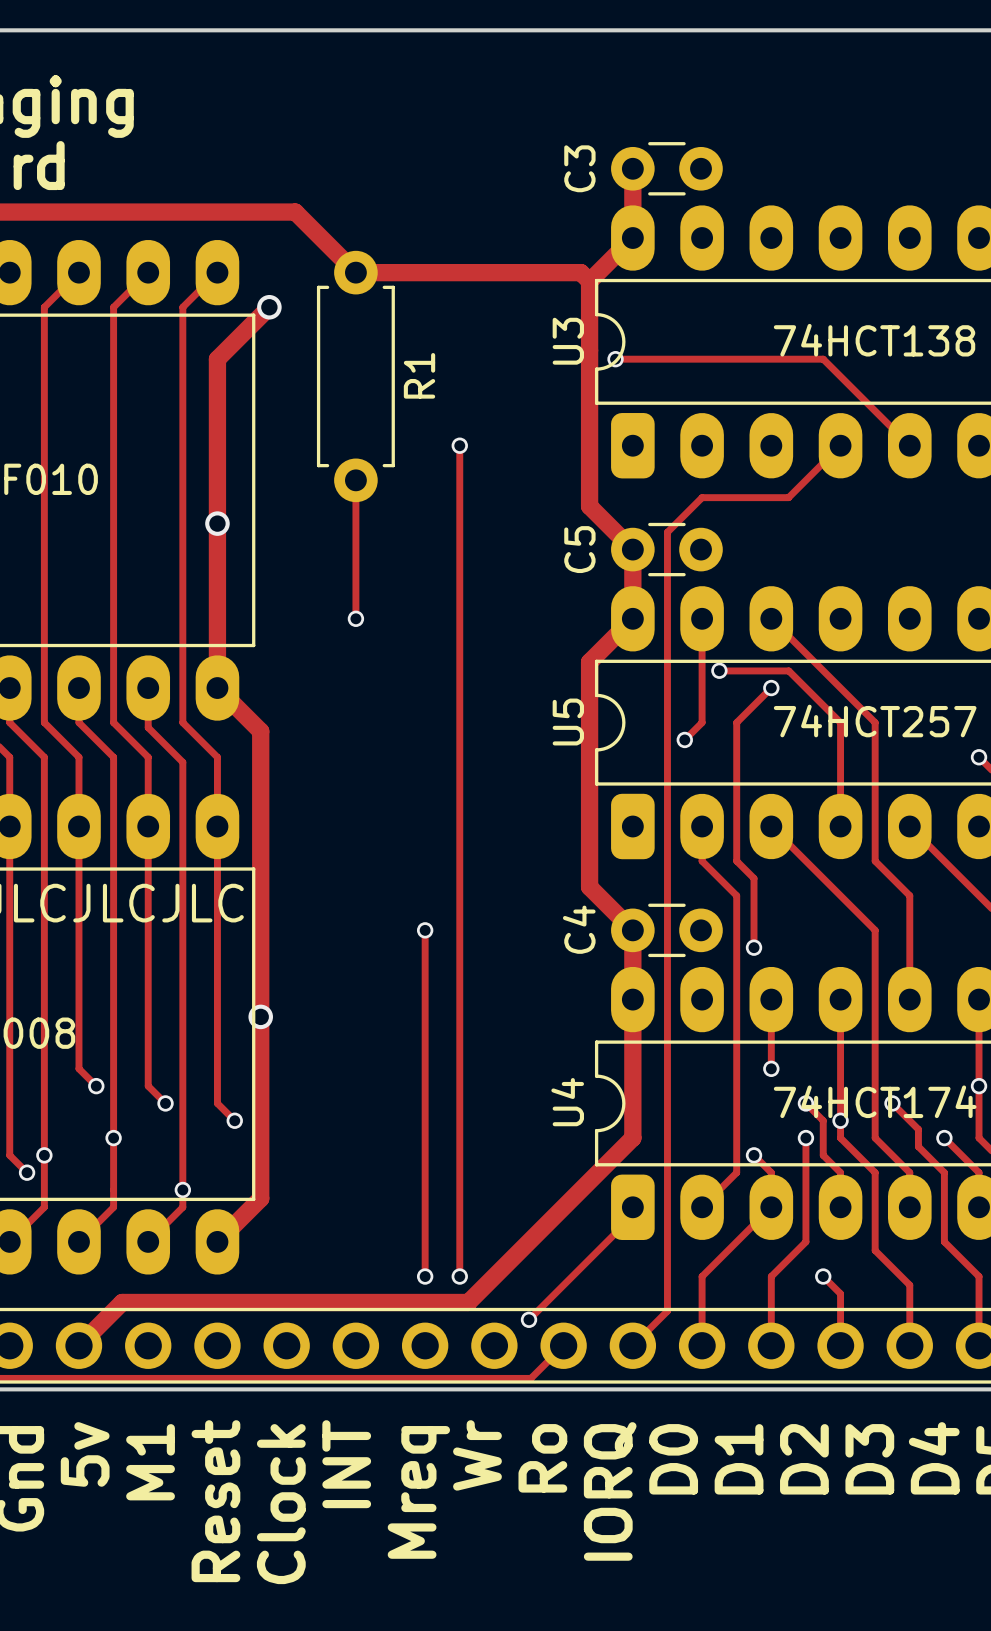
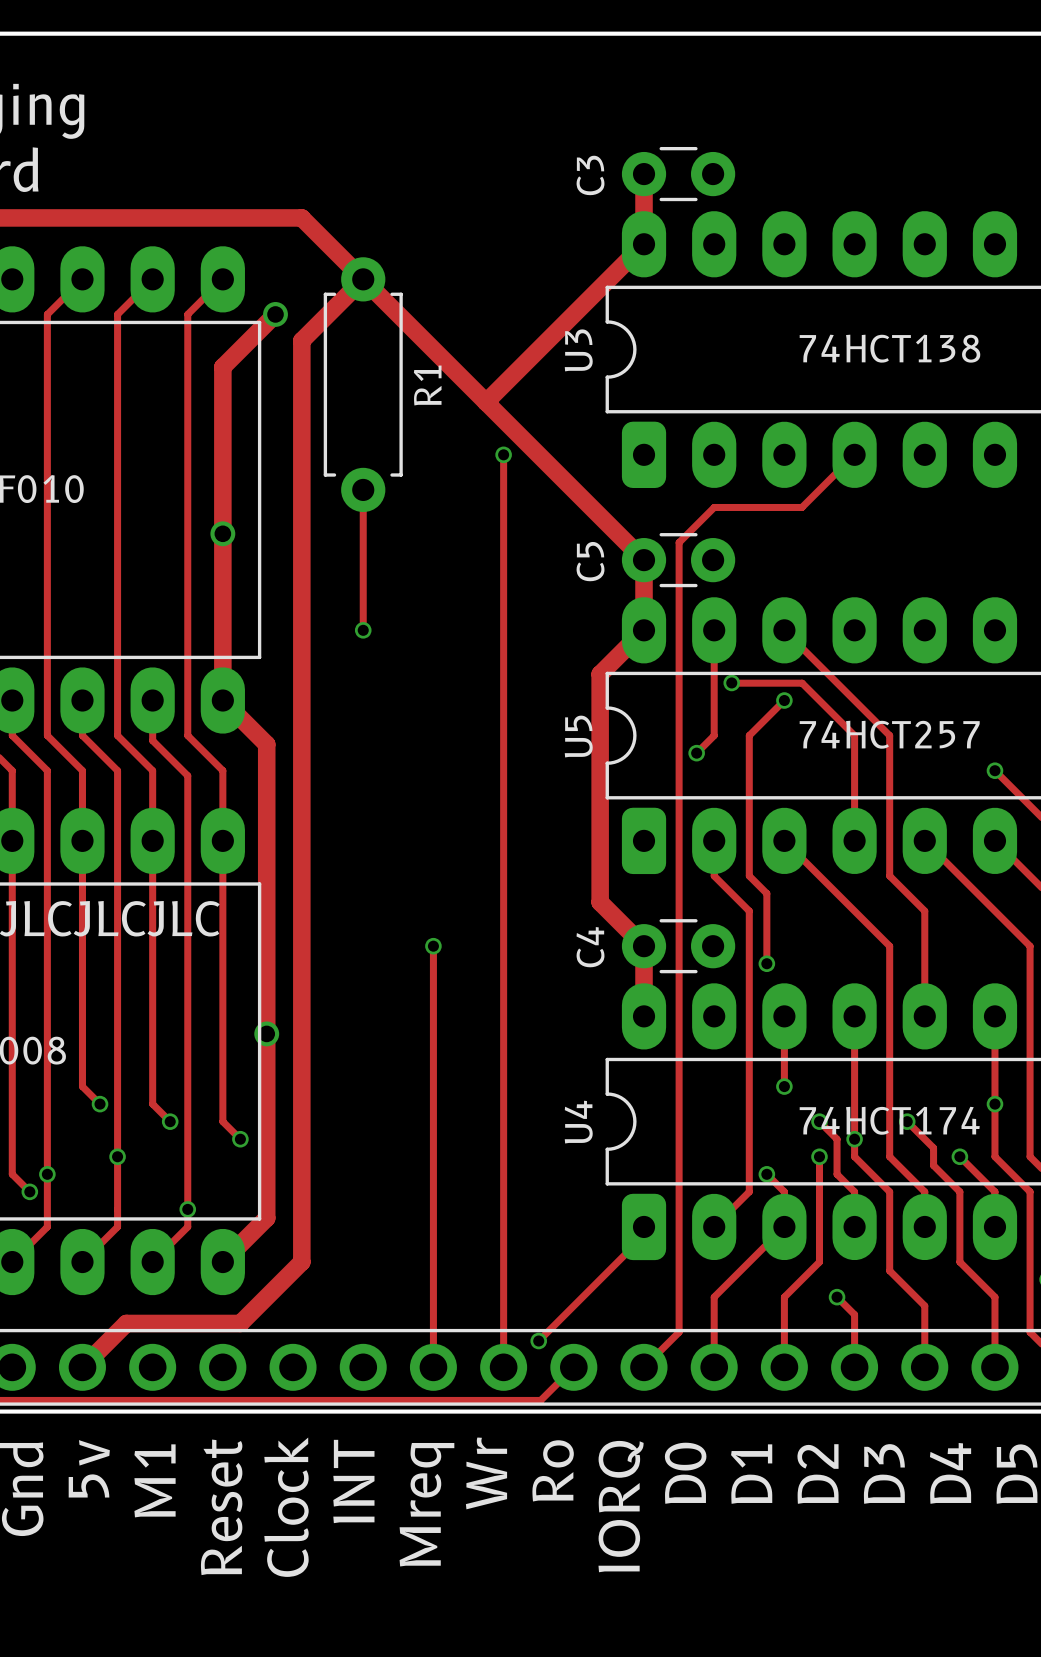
track: (355, 272) (580, 272) (589, 281) (589, 506) -> none
track: none -> (600, 288) (486, 402)
track: (615, 359) (823, 359) (909, 445) -> none
via: (615, 359) -> none
track: (459, 445) (459, 1276) -> none
via position: (459, 445) -> (503, 454)
track: none -> (503, 454) (503, 1367)
track: (632, 999) (632, 1138) (468, 1302) (234, 1302) -> (600, 516) (363, 279) (301, 340) (301, 1262) (240, 1323)
track: none -> (433, 1297) (433, 1367)
via: (425, 1276) -> none
via: (459, 1276) -> none

